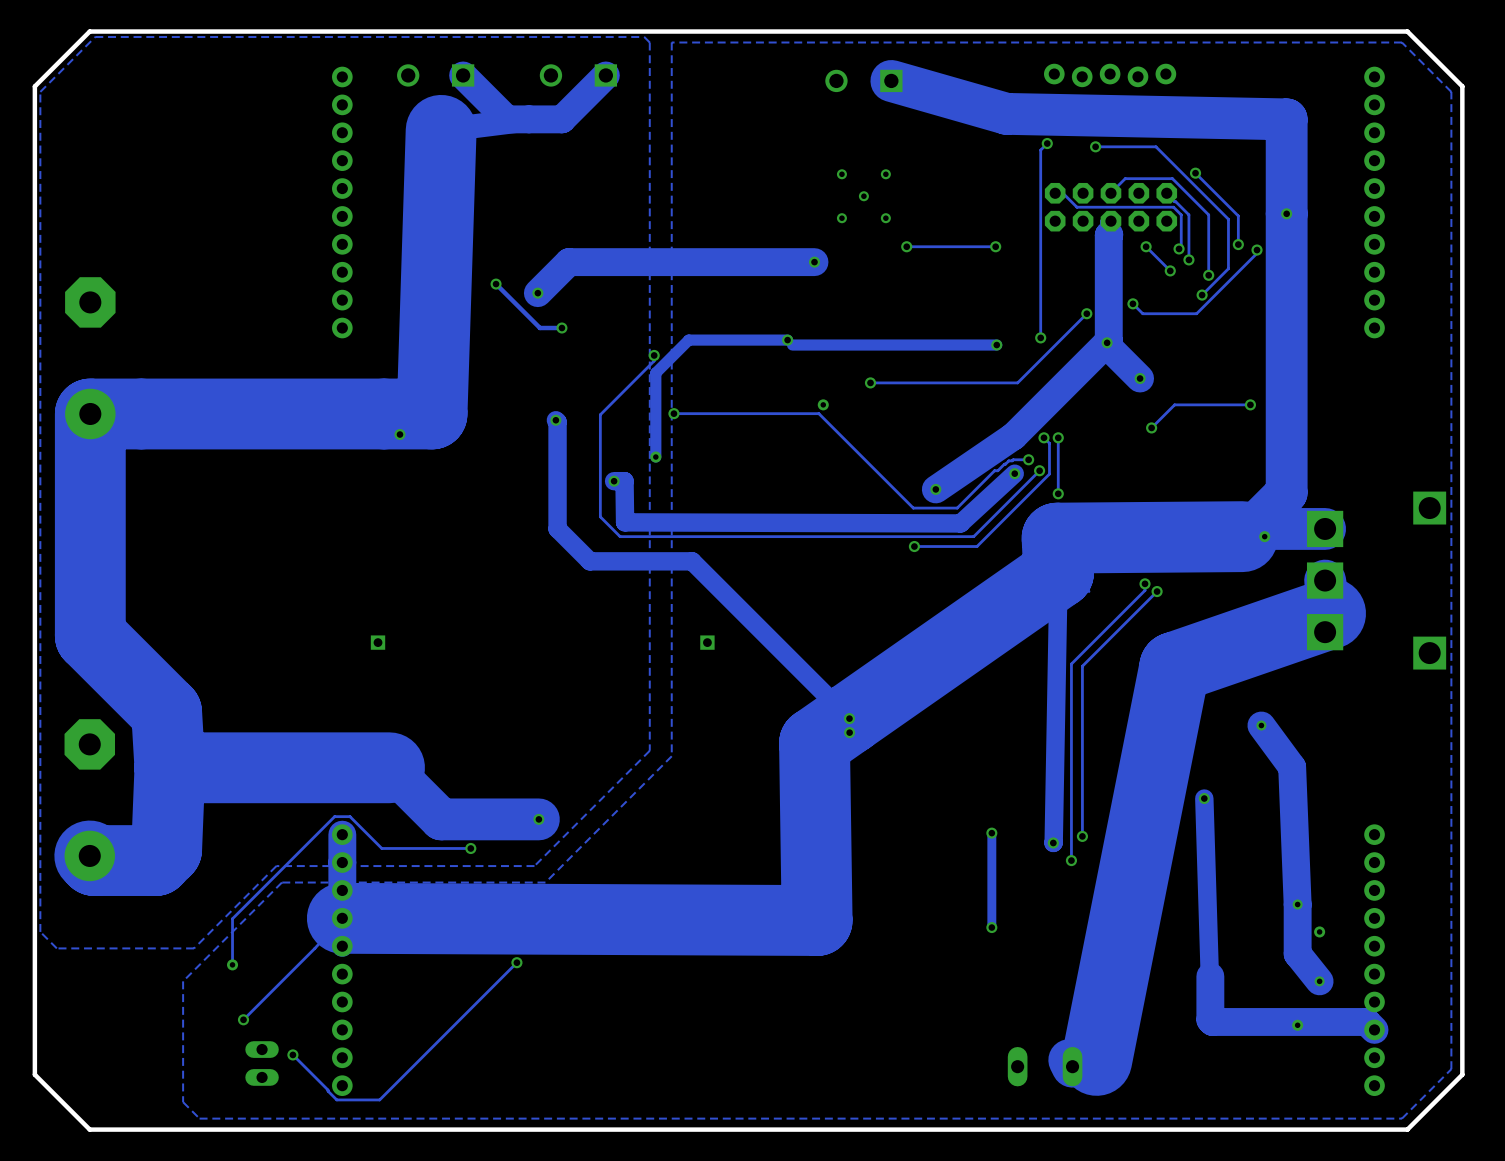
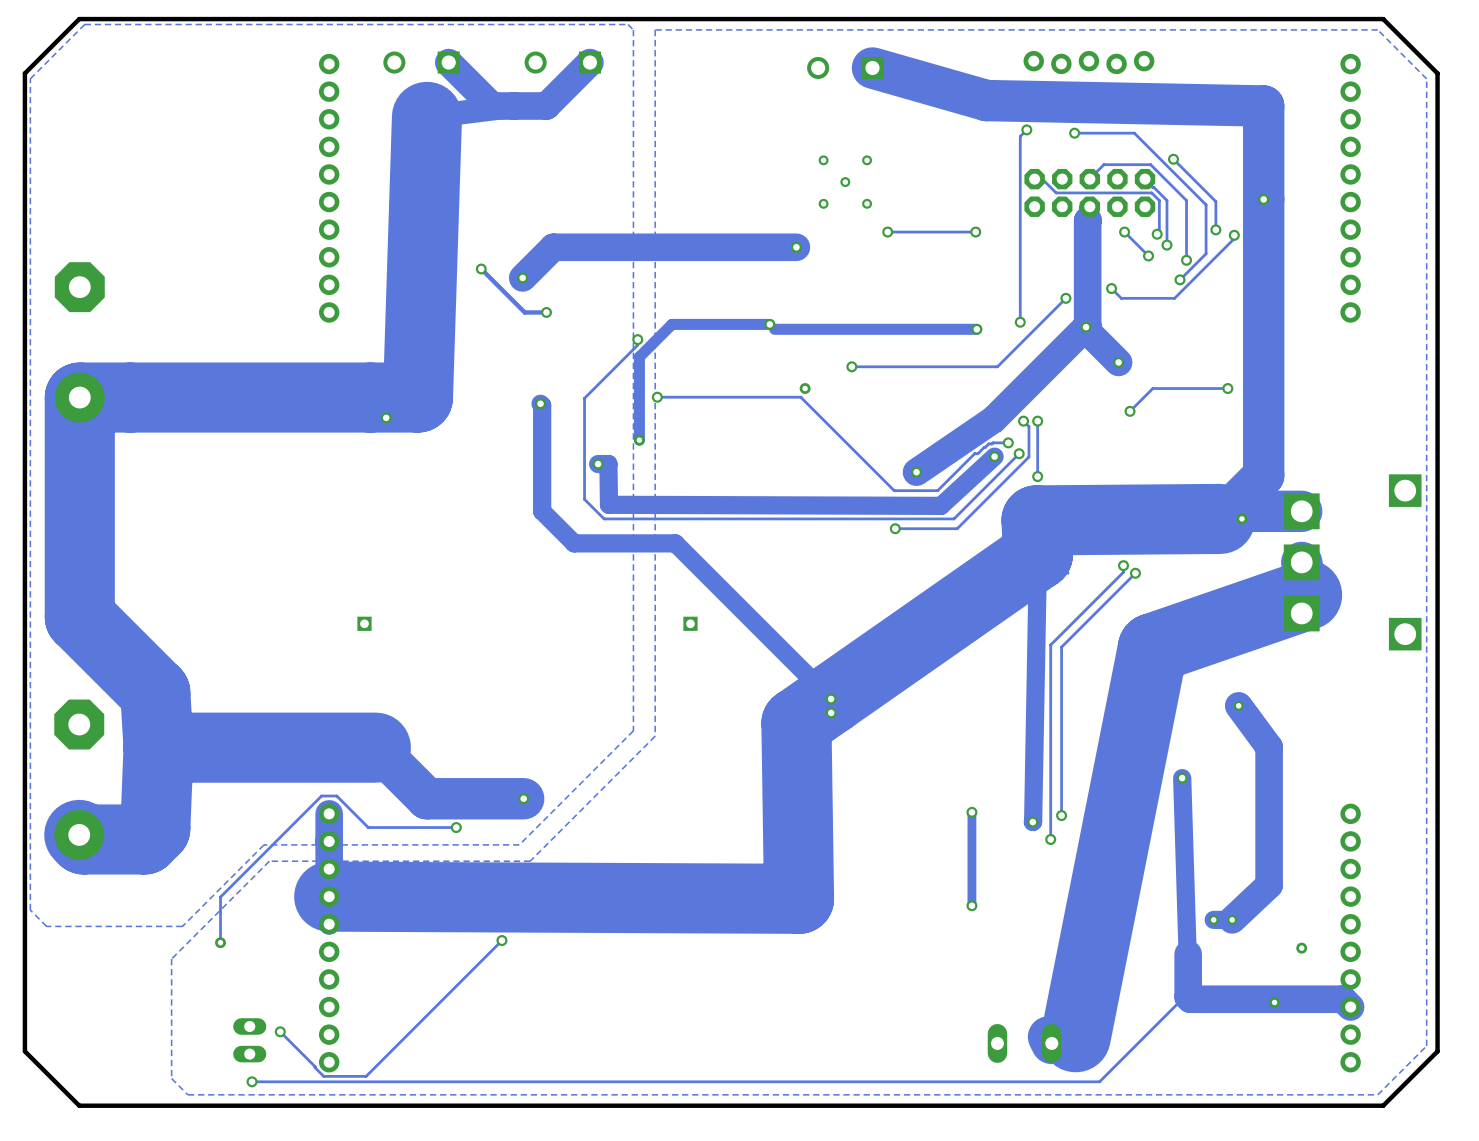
track: (1292, 767) (1297, 953) (1319, 981) -> (1269, 747) (1269, 885) (1232, 919) (1213, 919)
via: (1297, 904) -> none
track: (342, 918) (243, 1019) -> none
part position: (1319, 931) -> (1301, 948)
via: none -> (1213, 919)
via: none -> (1232, 919)
via: (1319, 981) -> none
via: (243, 1019) -> none
track: none -> (1188, 997) (1176, 1004) (1099, 1081) (252, 1081)
via: none -> (252, 1081)

